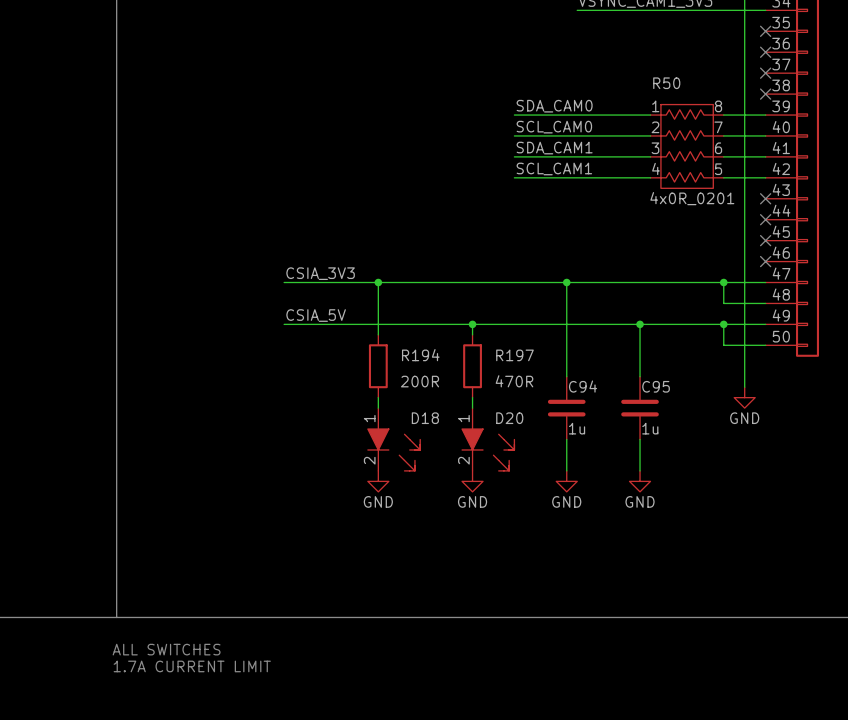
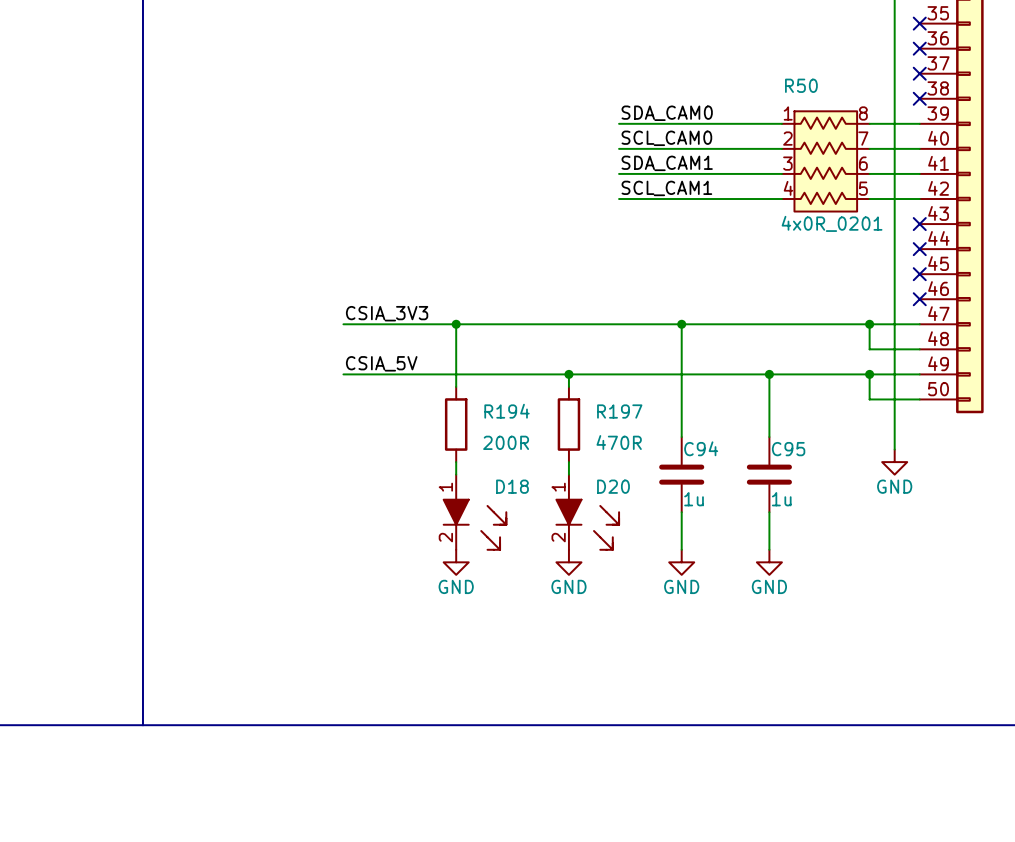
text: ALL SWITCHES (166, 649) -> none
text: 1.7A CURRENT LIMIT (192, 666) -> none

